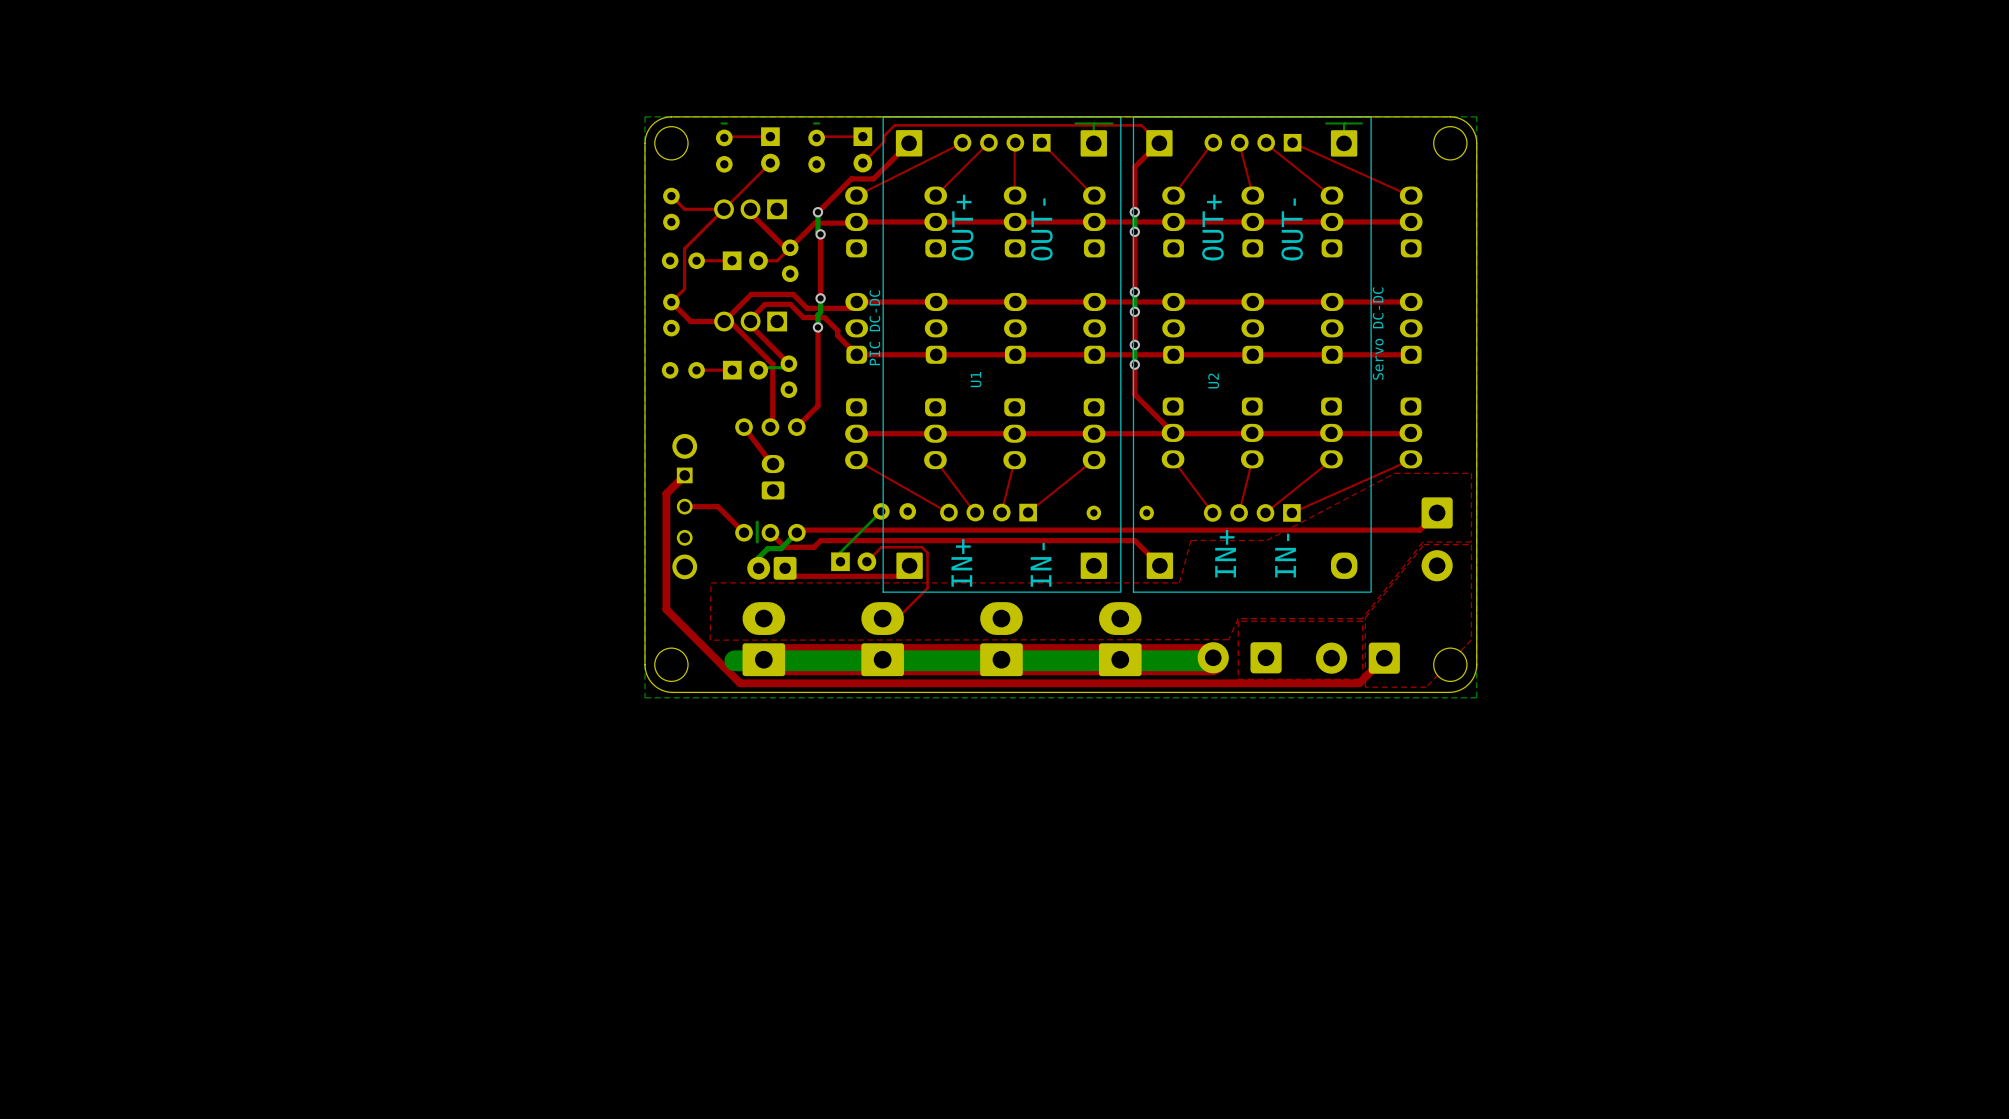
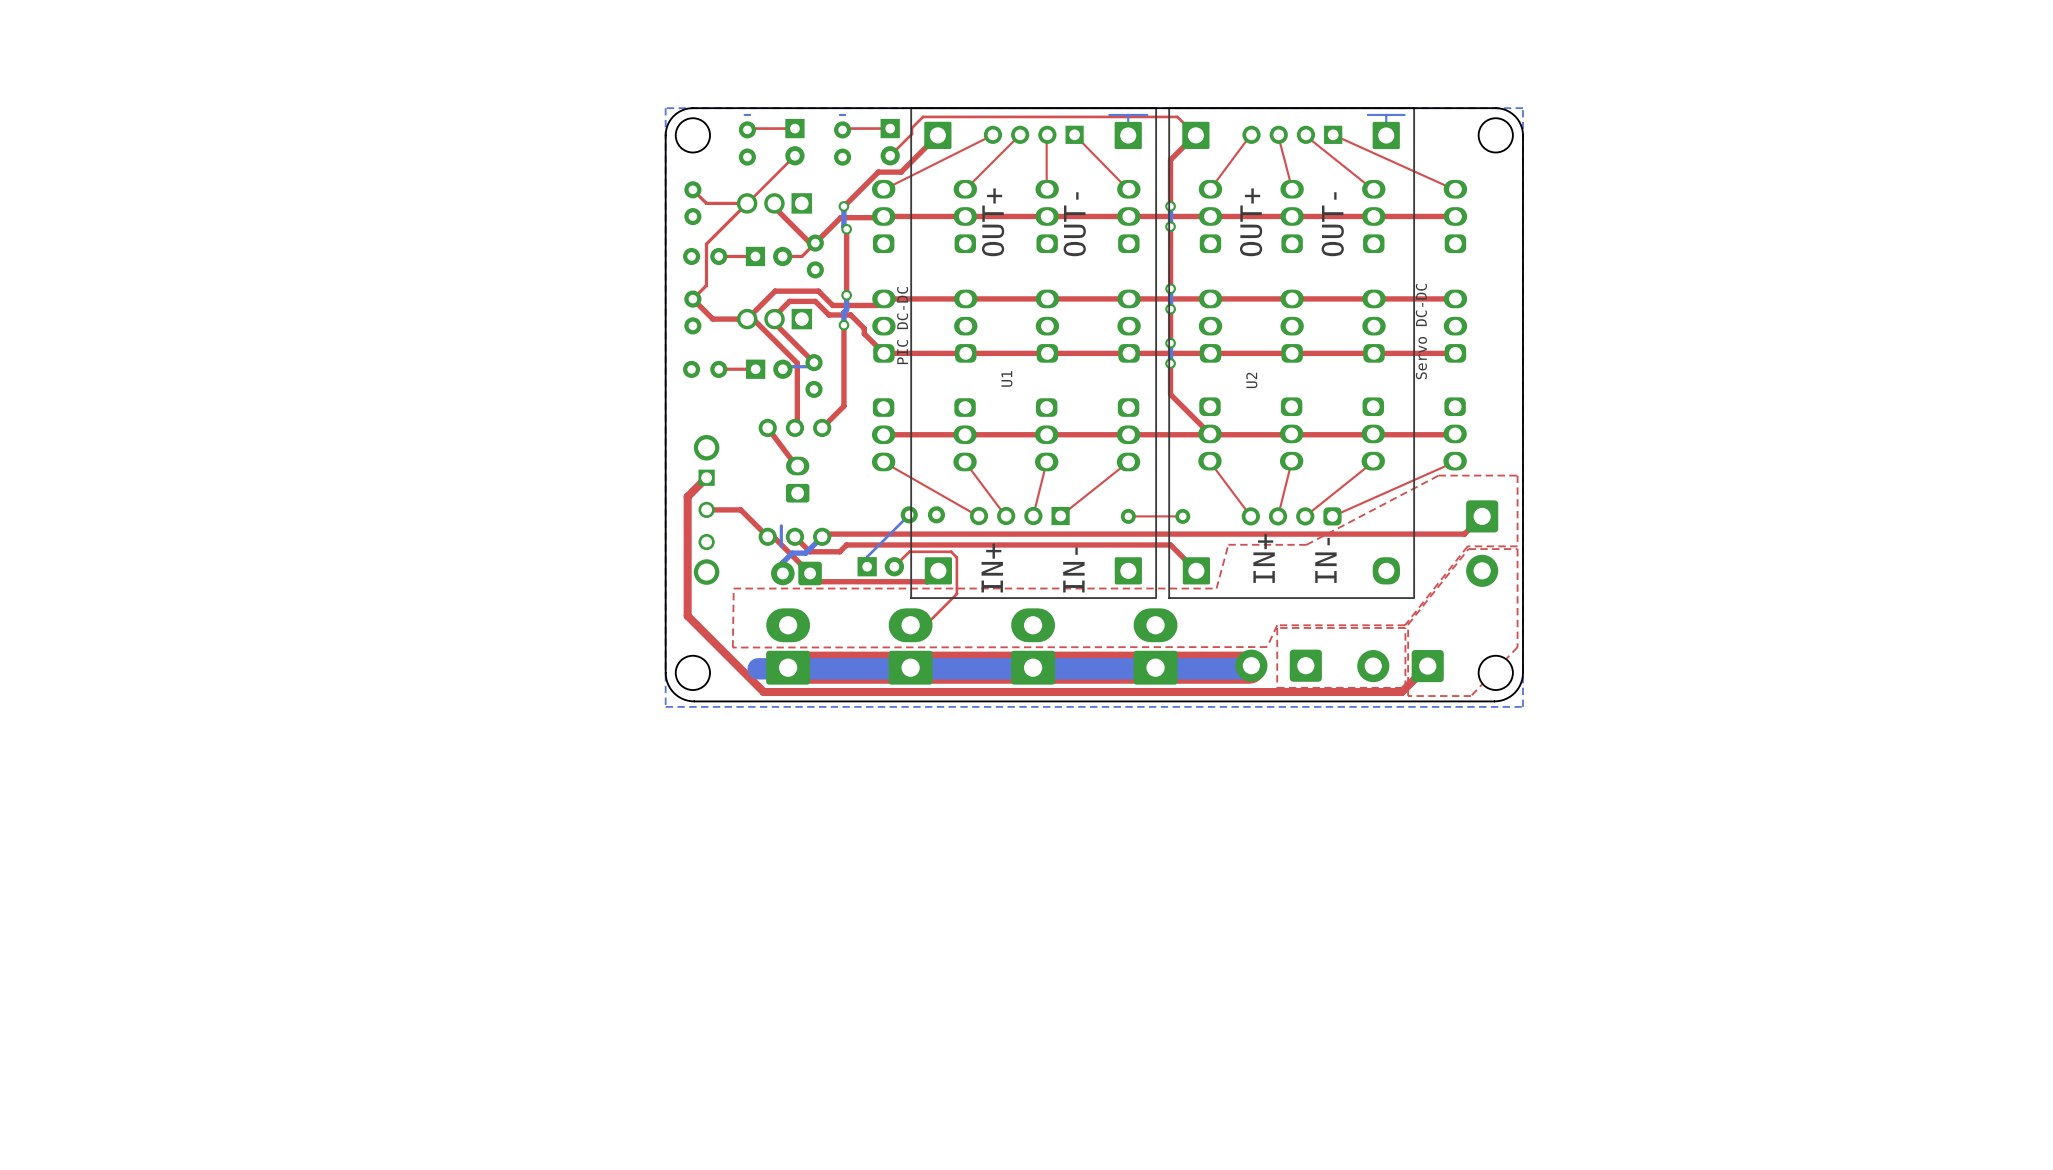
part footprint: [1203, 504, 1301, 522] -> [1241, 507, 1342, 526]
top track: none -> (1182, 516) (1128, 516)
top track: none -> (767, 536) (773, 536) (810, 573)

